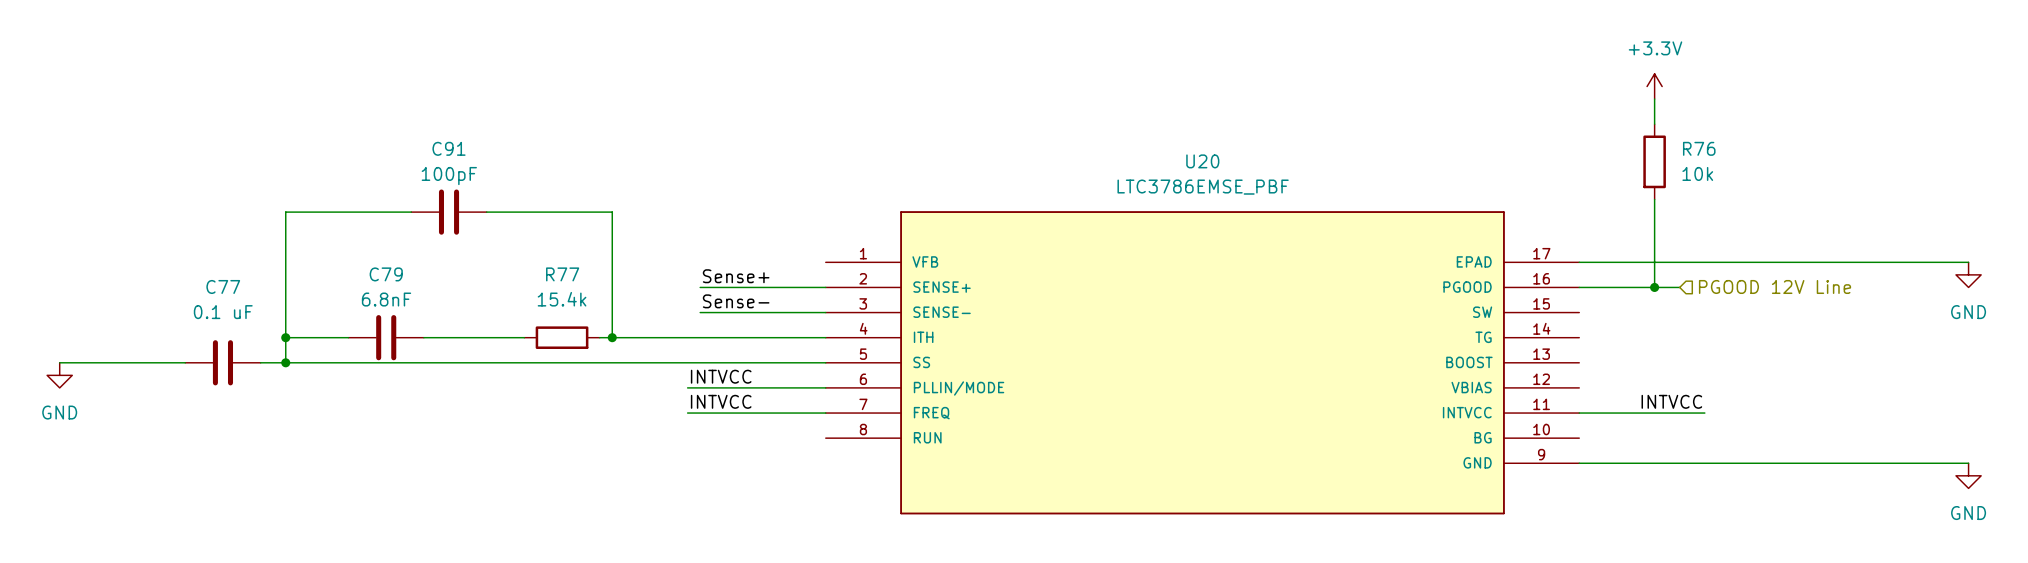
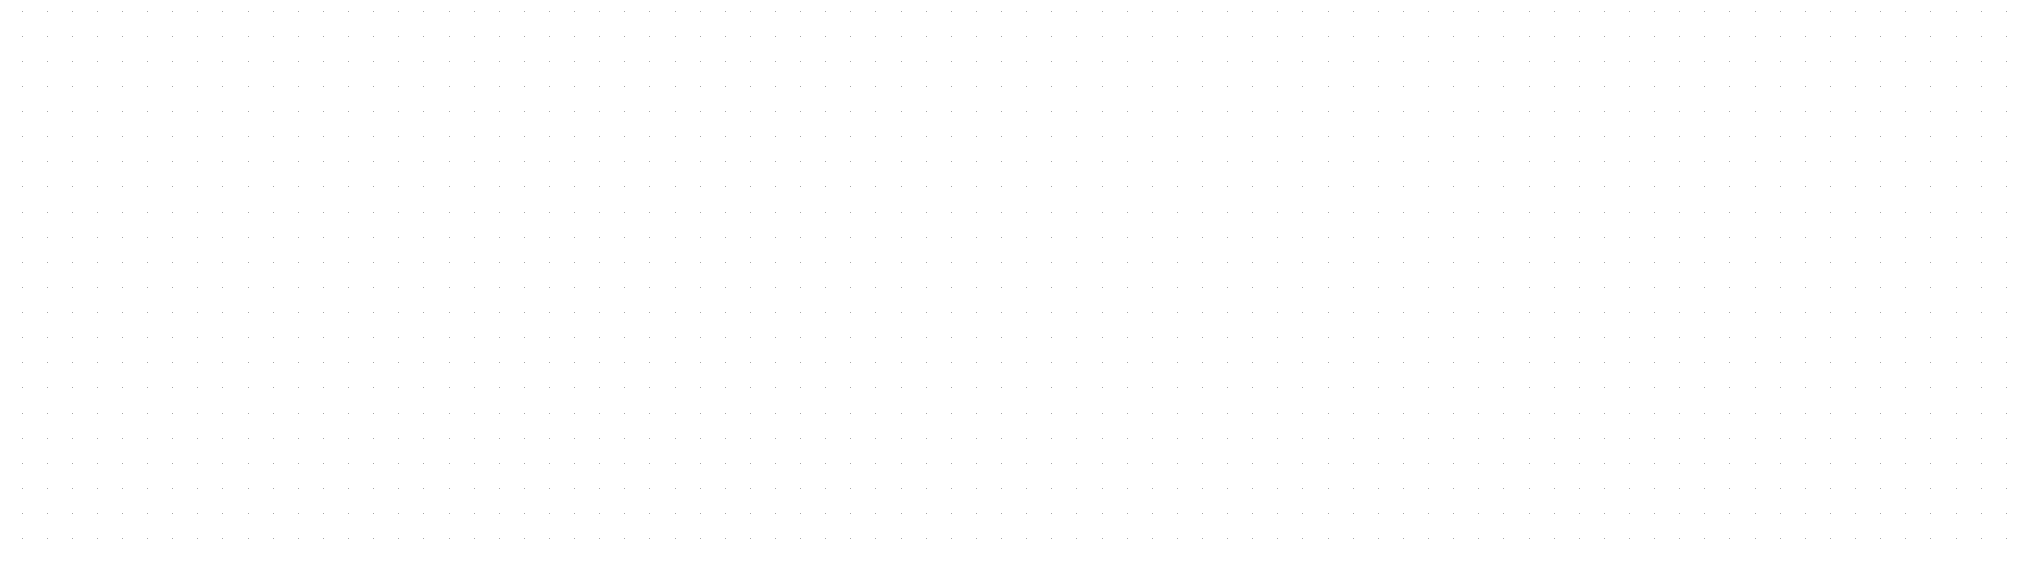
power symbol: +3.3V (1654, 86) -> none
wire: (1654, 99) (1654, 124) -> none
R76: 10k (1654, 161) -> none
wire: (1654, 199) (1654, 287) -> none
wire: (411, 212) (285, 212) (285, 362) -> none
C91: 100pF (449, 212) -> none
wire: (486, 212) (612, 212) (612, 337) -> none
wire: (1579, 262) (1968, 262) -> none
power symbol: GND (1968, 274) -> none
label: Sense+ (736, 276) -> none
hierarchical label: PGOOD 12V Line (1775, 286) -> none
wire: (700, 287) (825, 287) -> none
wire: (1579, 287) (1679, 287) -> none
junction: (1654, 287) -> none
label: Sense- (736, 301) -> none
wire: (700, 312) (825, 312) -> none
wire: (285, 337) (348, 337) -> none
junction: (285, 337) -> none
C79: 6.8nF (386, 337) -> none
wire: (423, 337) (524, 337) -> none
R77: 15.4k (562, 337) -> none
wire: (599, 337) (825, 337) -> none
junction: (612, 337) -> none
wire: (59, 362) (185, 362) -> none
C77: 0.1 uF (222, 362) -> none
wire: (260, 362) (825, 362) -> none
junction: (285, 362) -> none
U20: LTC3786EMSE_PBF (1202, 362) -> none
power symbol: GND (59, 375) -> none
label: INTVCC (721, 376) -> none
wire: (687, 387) (825, 387) -> none
label: INTVCC (721, 401) -> none
label: INTVCC (1671, 401) -> none
wire: (687, 413) (825, 413) -> none
wire: (1579, 413) (1704, 413) -> none
wire: (1579, 463) (1968, 463) -> none
power symbol: GND (1968, 475) -> none

